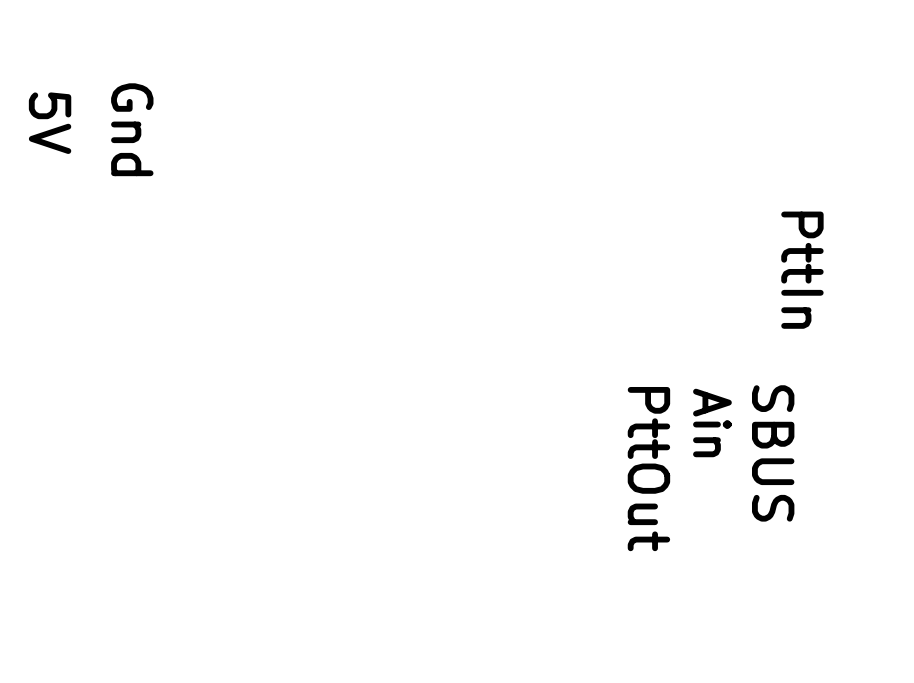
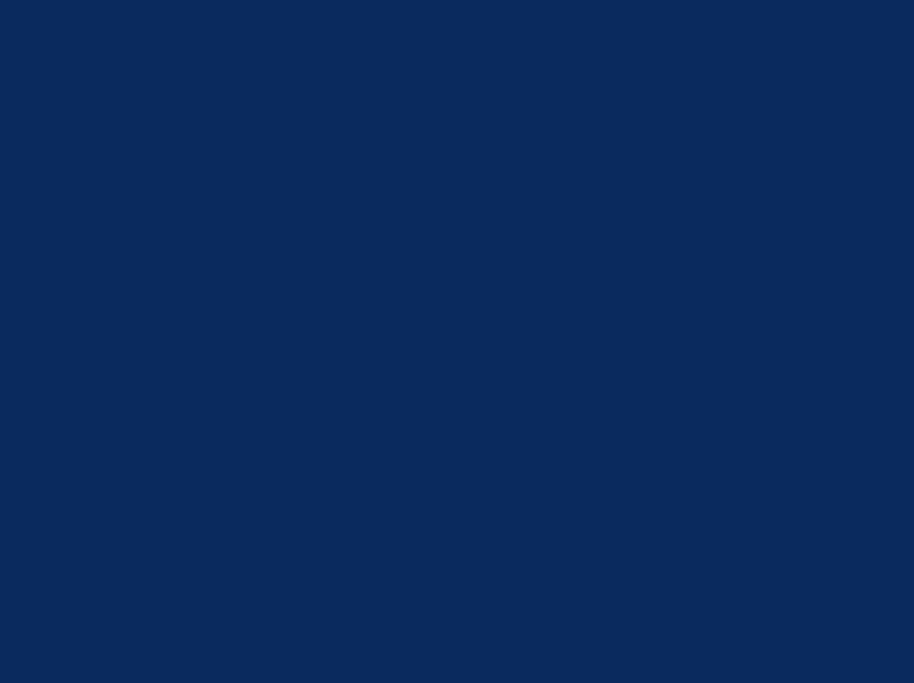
text: 5V (50, 123) -> none
text: Gnd (132, 129) -> none
text: PttIn (802, 270) -> none
text: Ain (712, 422) -> none
text: SBUS (773, 453) -> none
text: PttOut (648, 469) -> none

